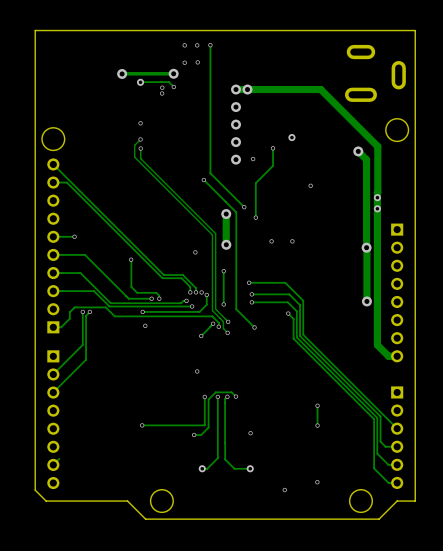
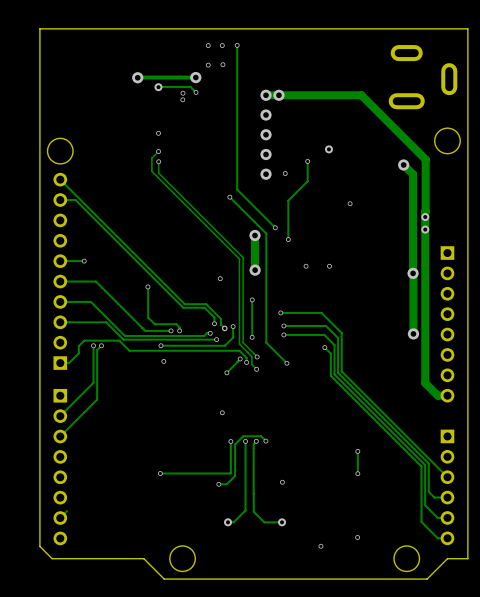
track: none -> (220, 323) (224, 328)
via: (195, 292) -> none
via: (201, 292) -> none
via: none -> (224, 328)

